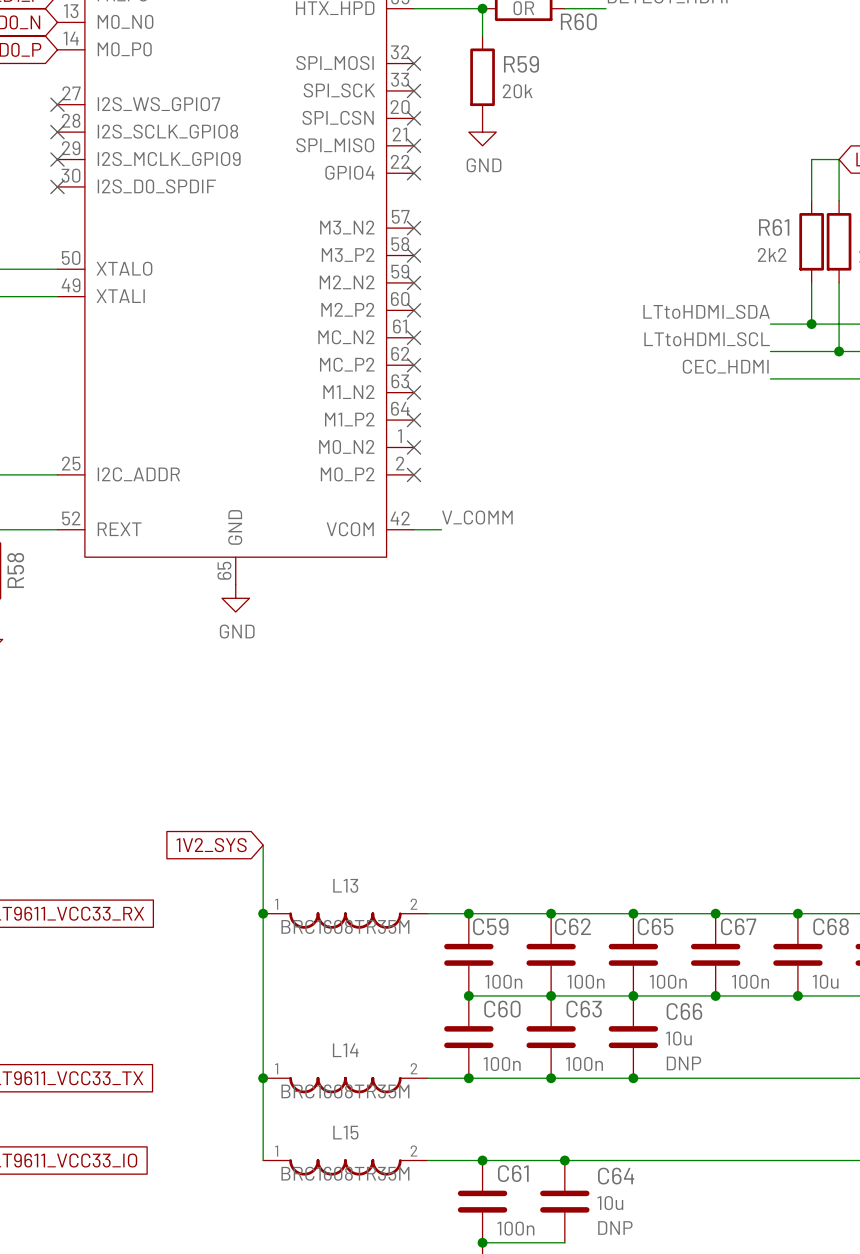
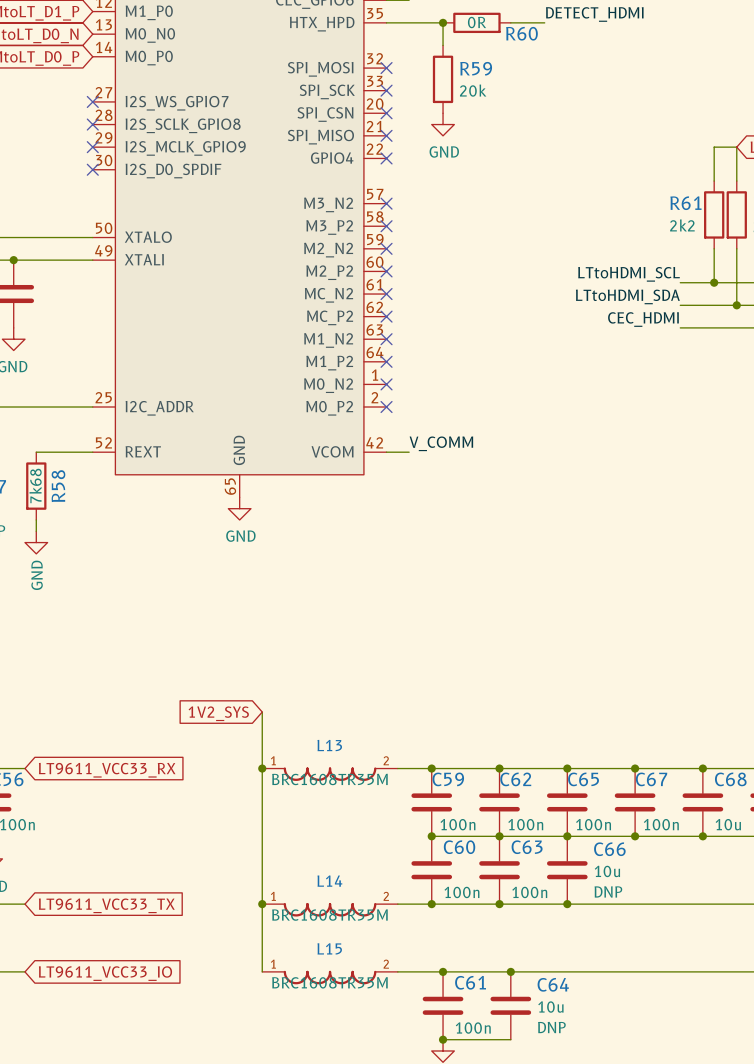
label: LTtoHDMI_SDA (706, 311) -> LTtoHDMI_SCL (629, 274)
label: LTtoHDMI_SCL (707, 339) -> LTtoHDMI_SDA (627, 296)

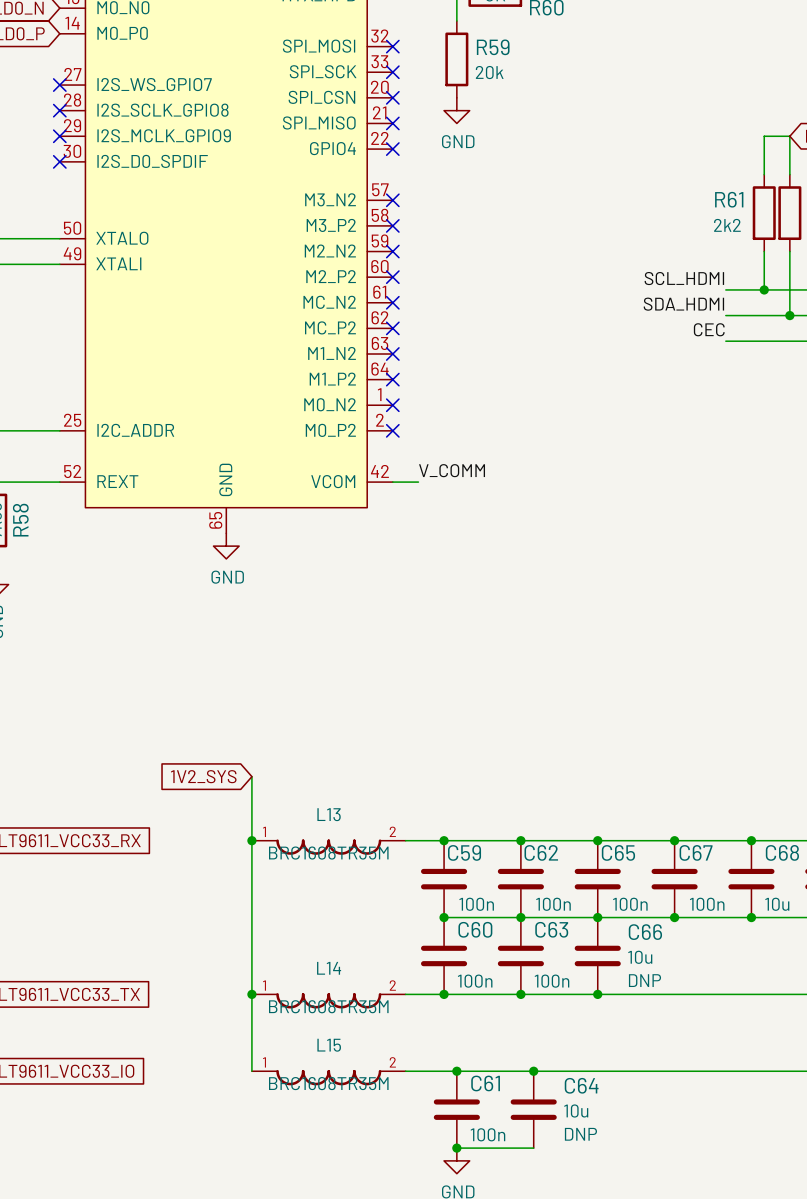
label: LTtoHDMI_SCL (629, 274) -> SCL_HDMI (684, 278)
label: LTtoHDMI_SDA (627, 296) -> SDA_HDMI (683, 304)
label: CEC_HDMI (643, 319) -> CEC (709, 329)

